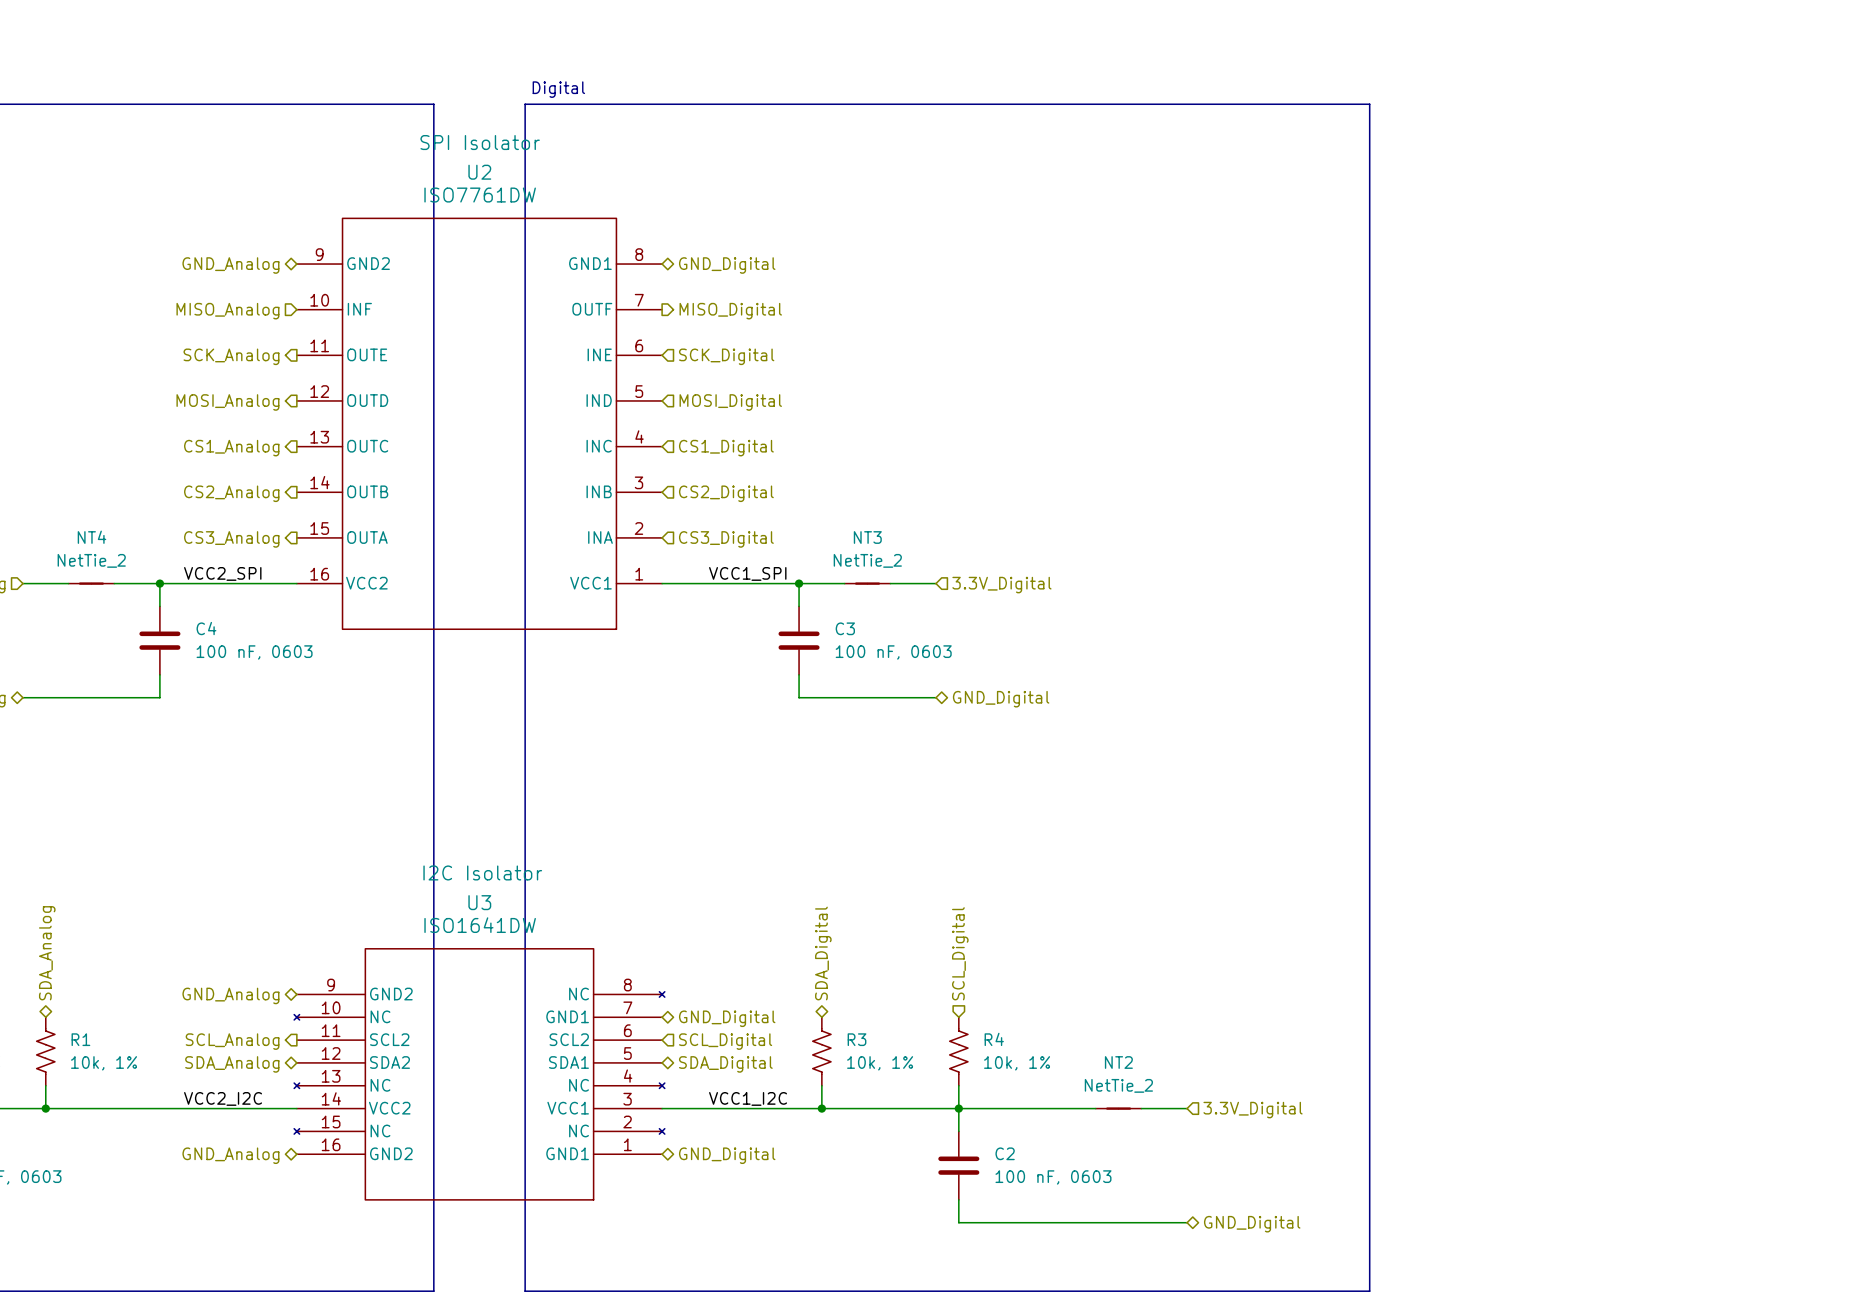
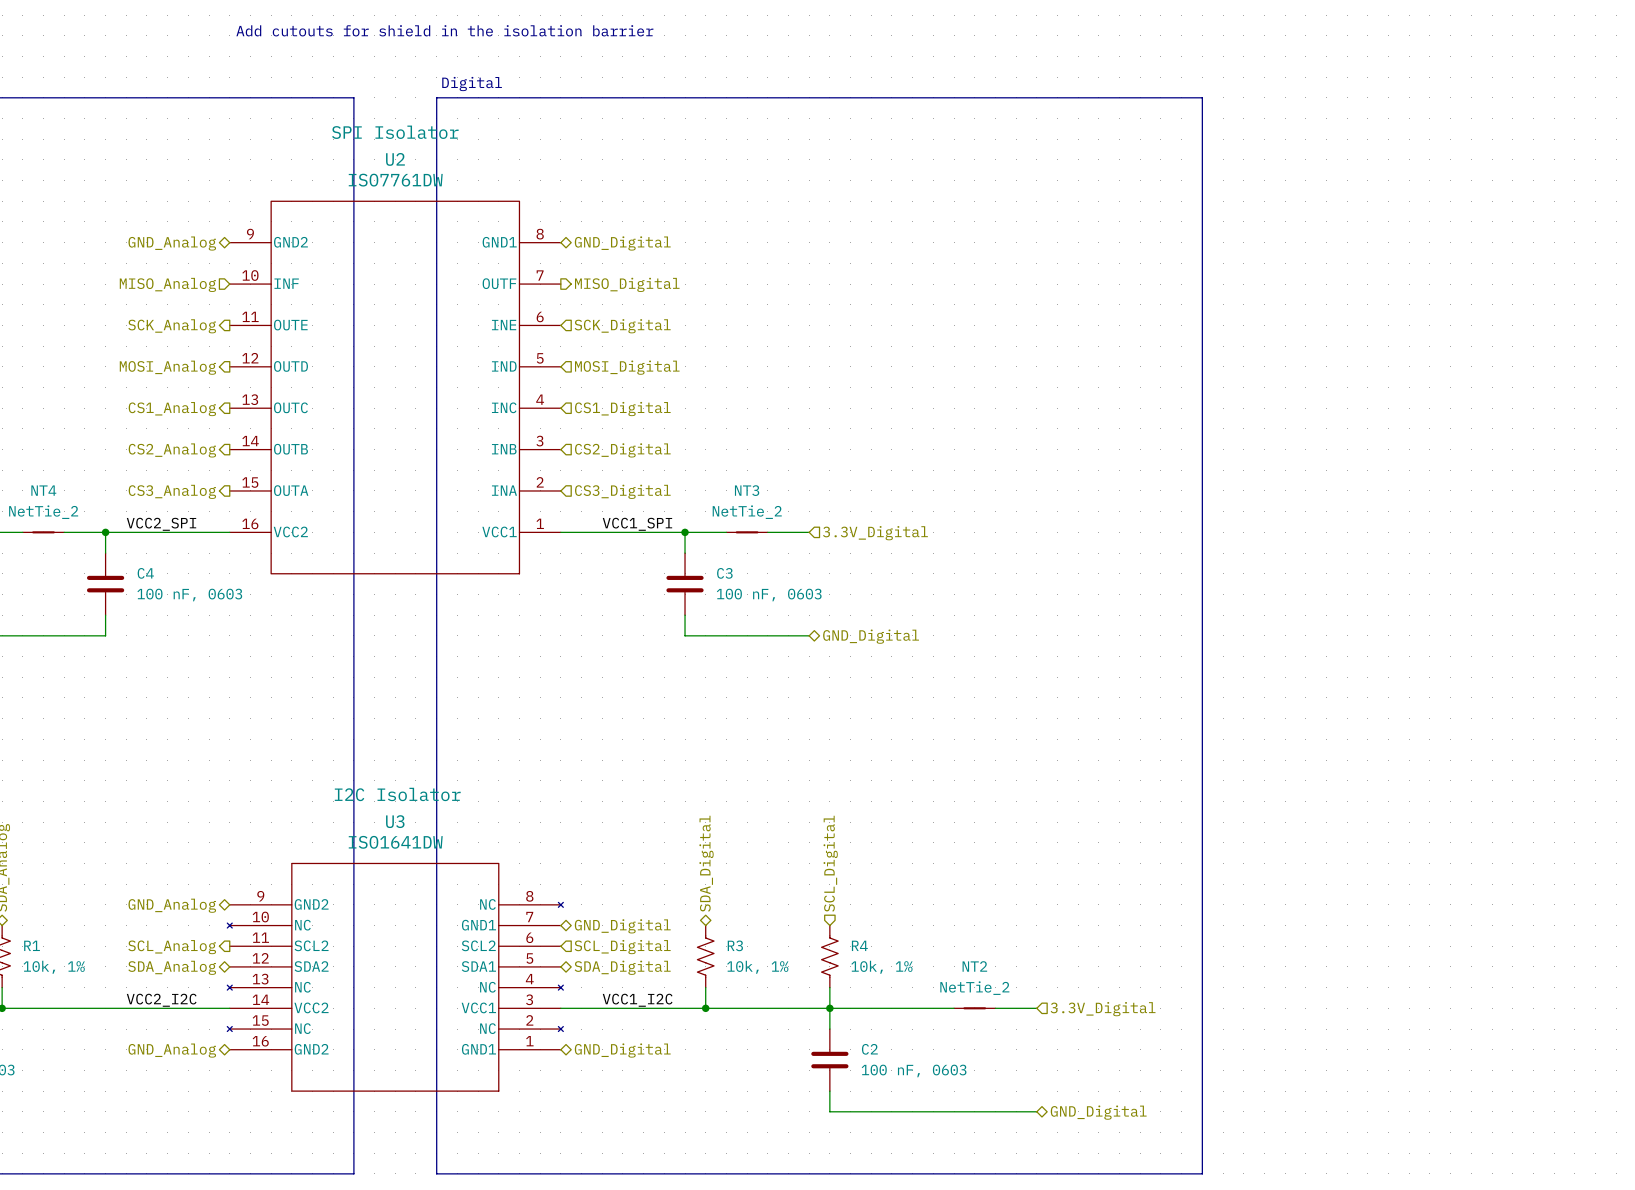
text: none -> Add cutouts for shield in the isolation barrier (444, 30)

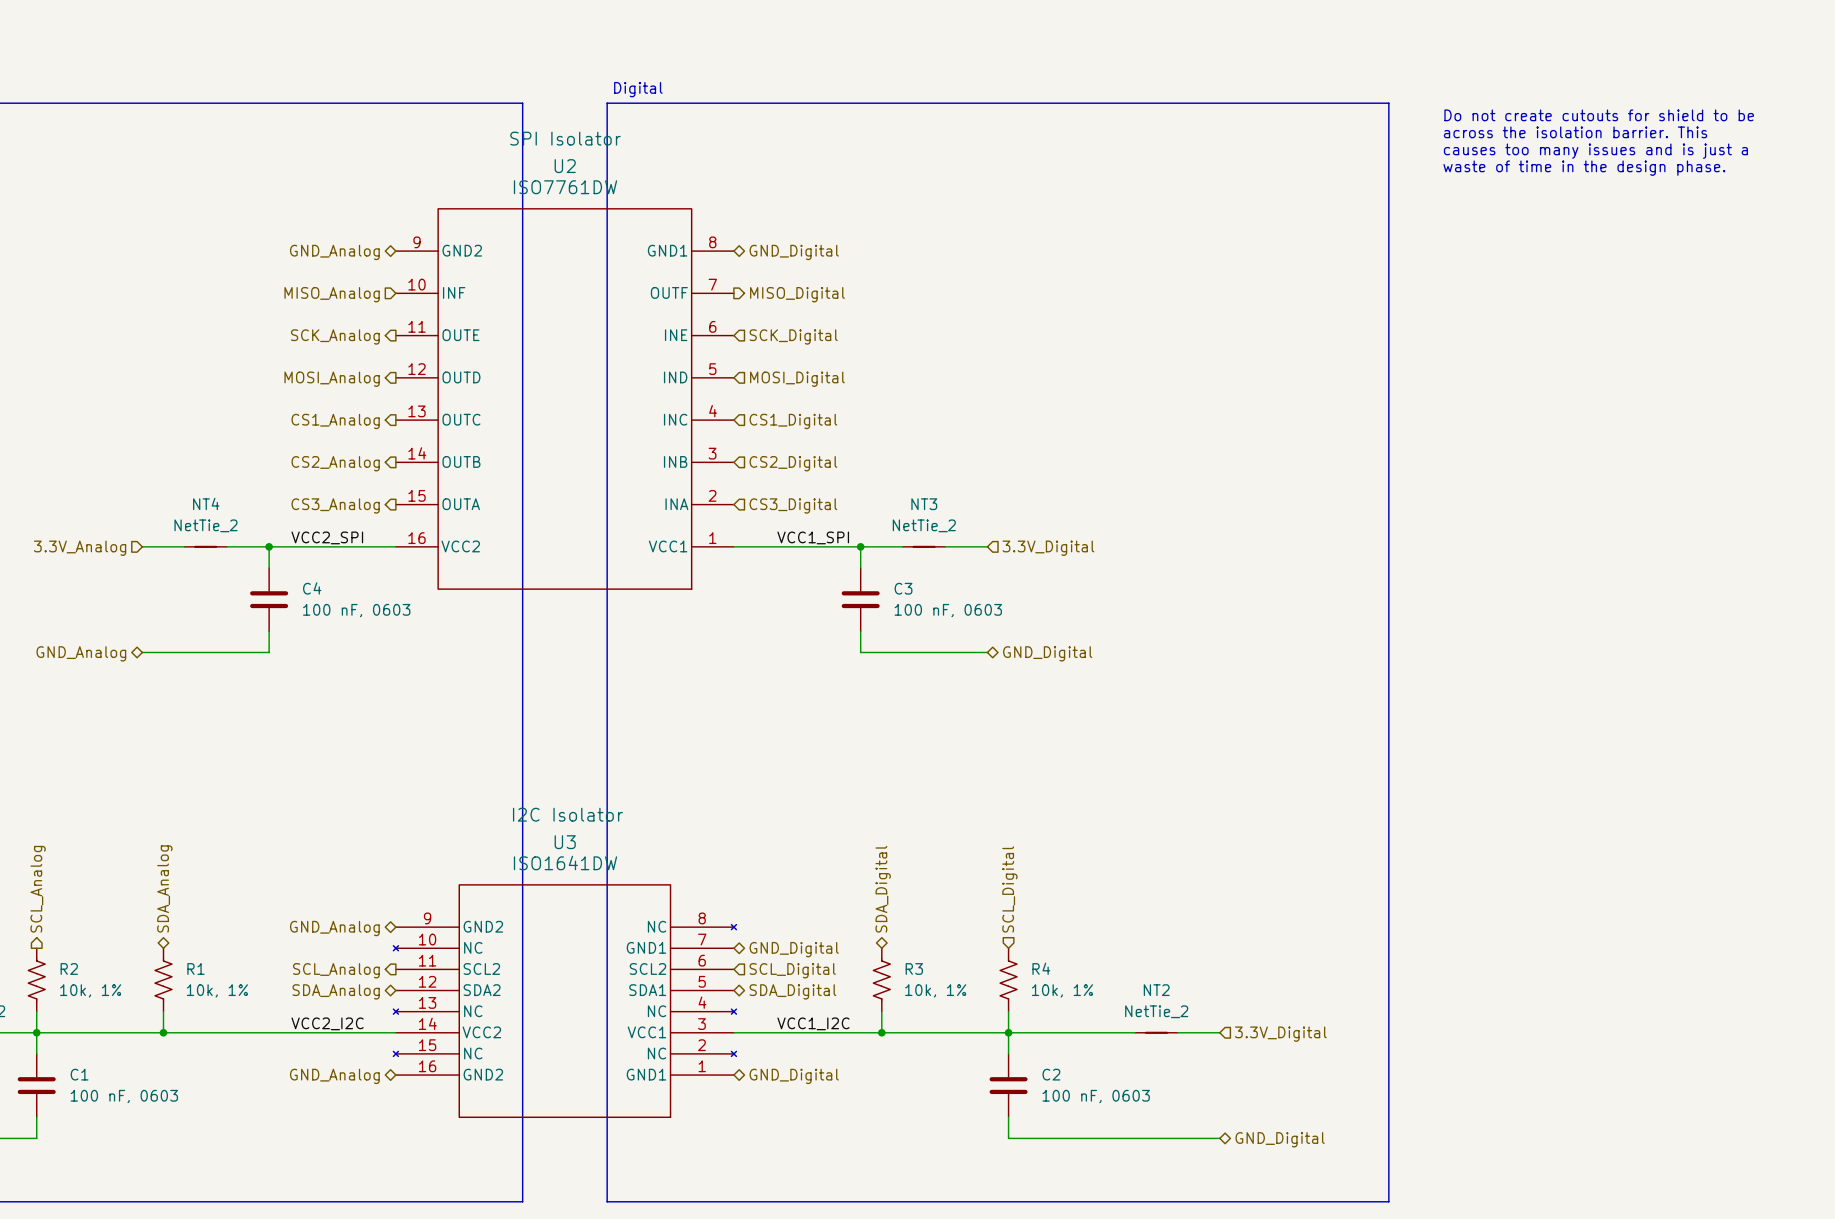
text: Add cutouts for shield in the isolation barrier (444, 30) -> none
text: none -> Do not create cutouts for shield to be (1599, 115)
text: none -> across the isolation barrier. This (1575, 132)
text: none -> causes too many issues and is just a (1595, 151)
text: none -> waste of time in the design phase. (1584, 168)

